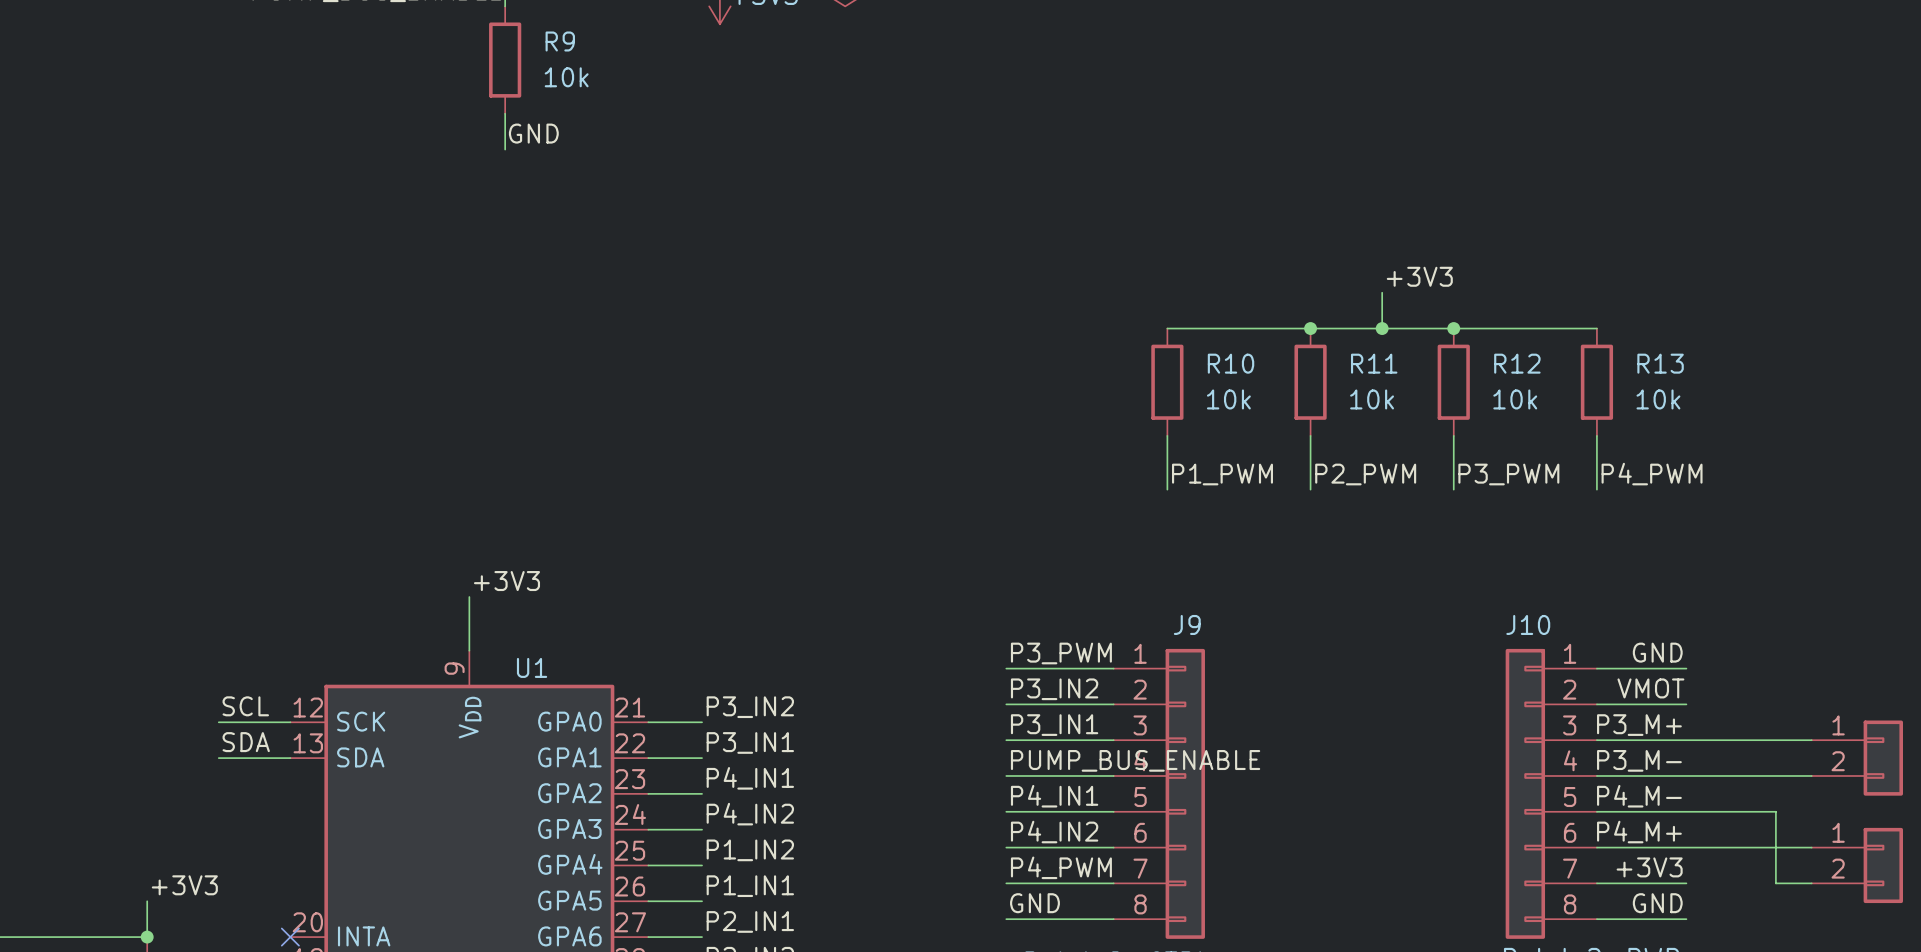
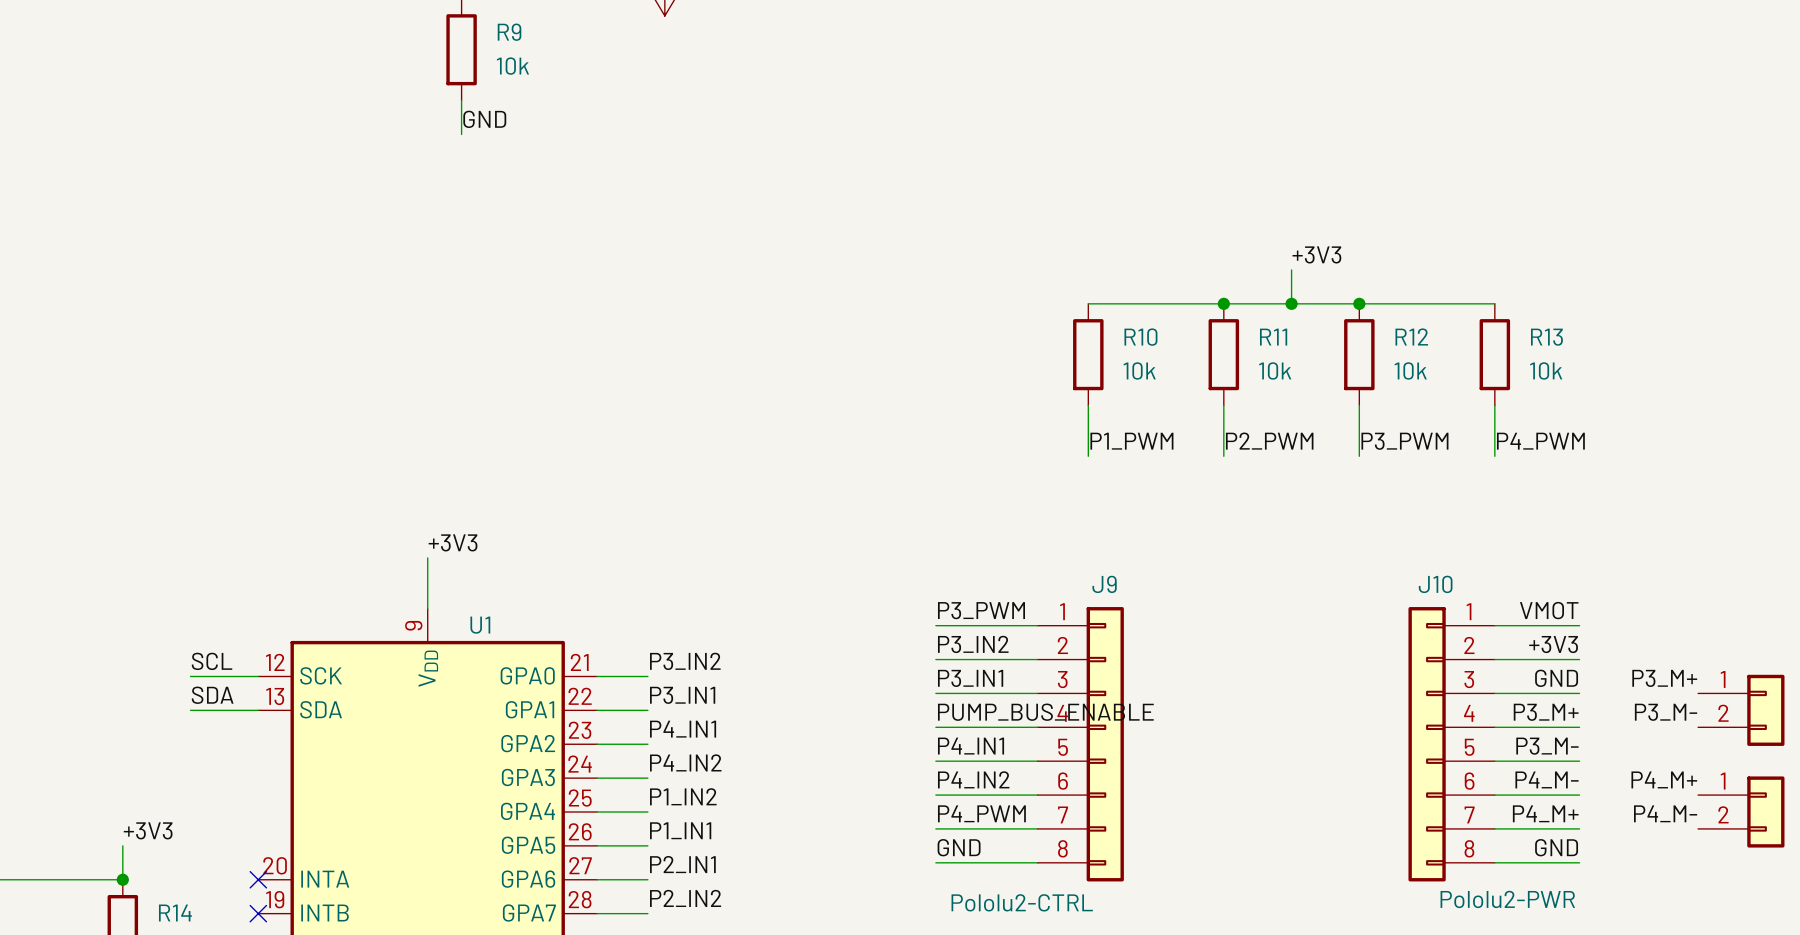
label: GND (1657, 652) -> VMOT (1549, 610)
label: VMOT (1650, 688) -> +3V3 (1553, 644)
label: P3_M+ (1639, 725) -> GND (1556, 678)
label: none -> P3_M+ (1664, 678)
wire: (1686, 740) (1811, 740) -> none
label: P3_M- (1639, 760) -> P3_M+ (1546, 712)
label: none -> P3_M- (1666, 712)
wire: (1686, 775) (1811, 775) -> none
label: P4_M- (1639, 796) -> P3_M- (1547, 746)
wire: (1686, 811) (1775, 811) (1775, 883) (1811, 883) -> none
label: P4_M+ (1639, 832) -> P4_M- (1547, 779)
label: none -> P4_M+ (1664, 779)
wire: (1686, 847) (1811, 847) -> none
label: +3V3 (1649, 867) -> P4_M+ (1545, 813)
label: none -> P4_M- (1665, 813)

